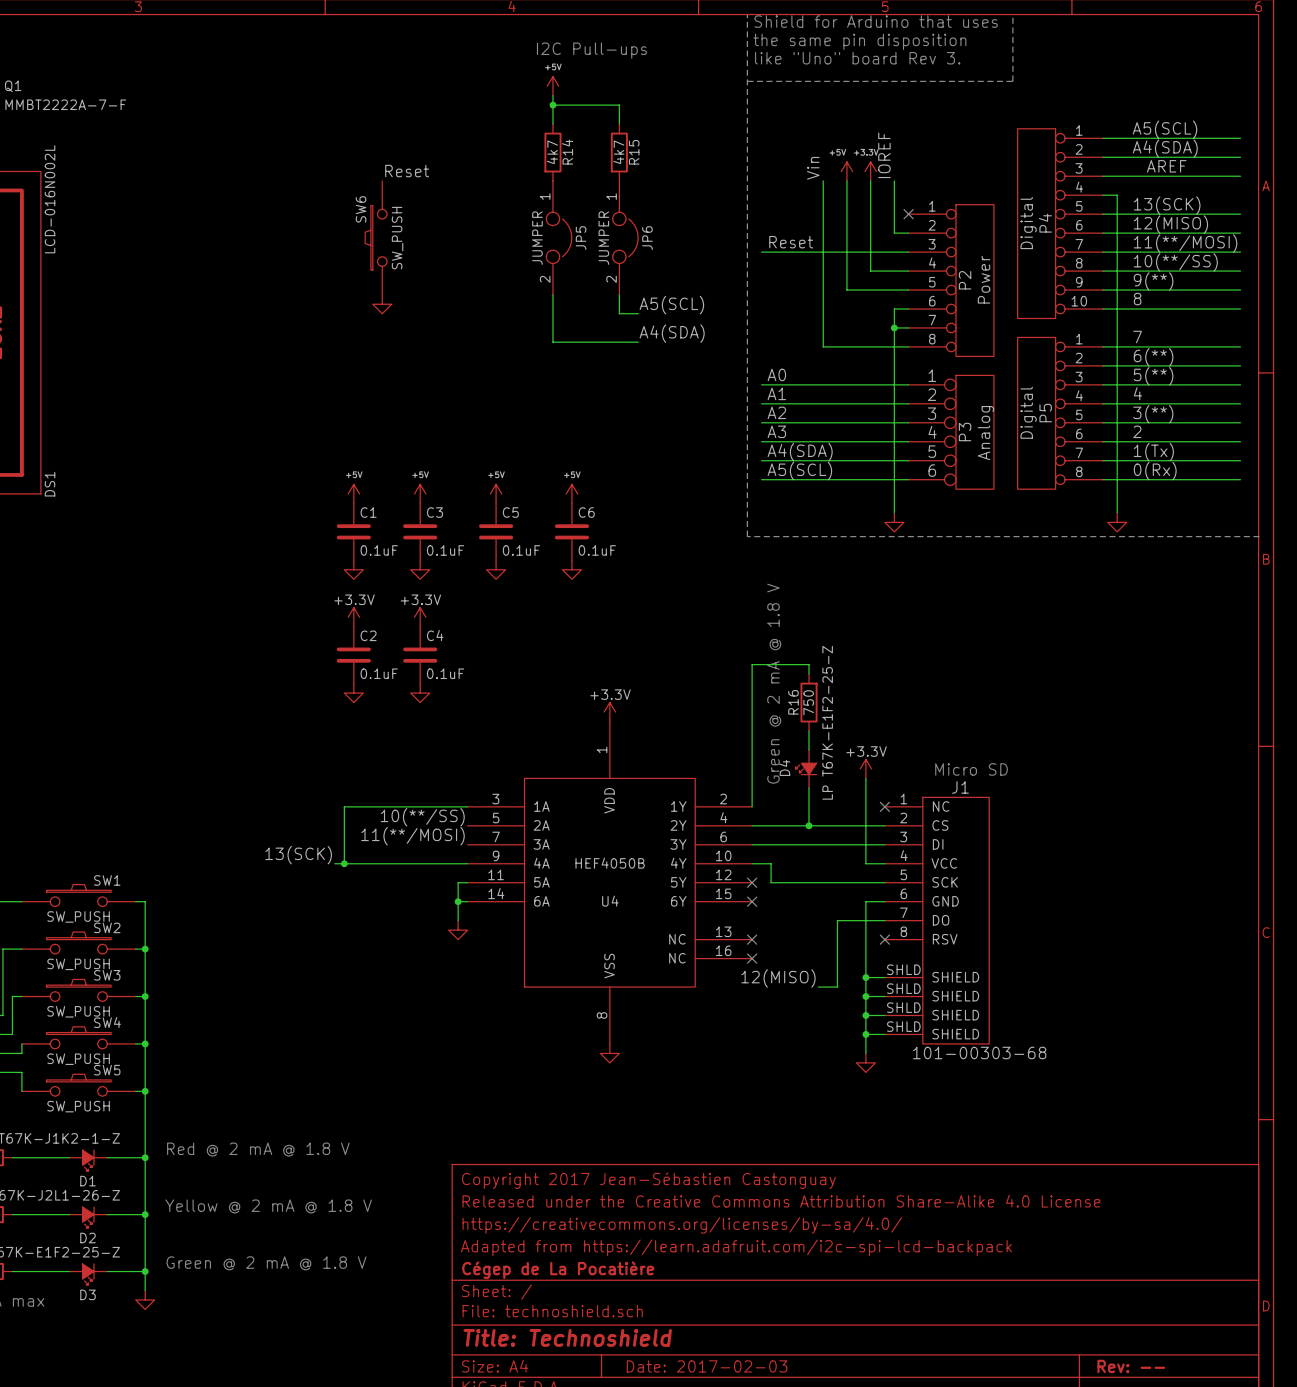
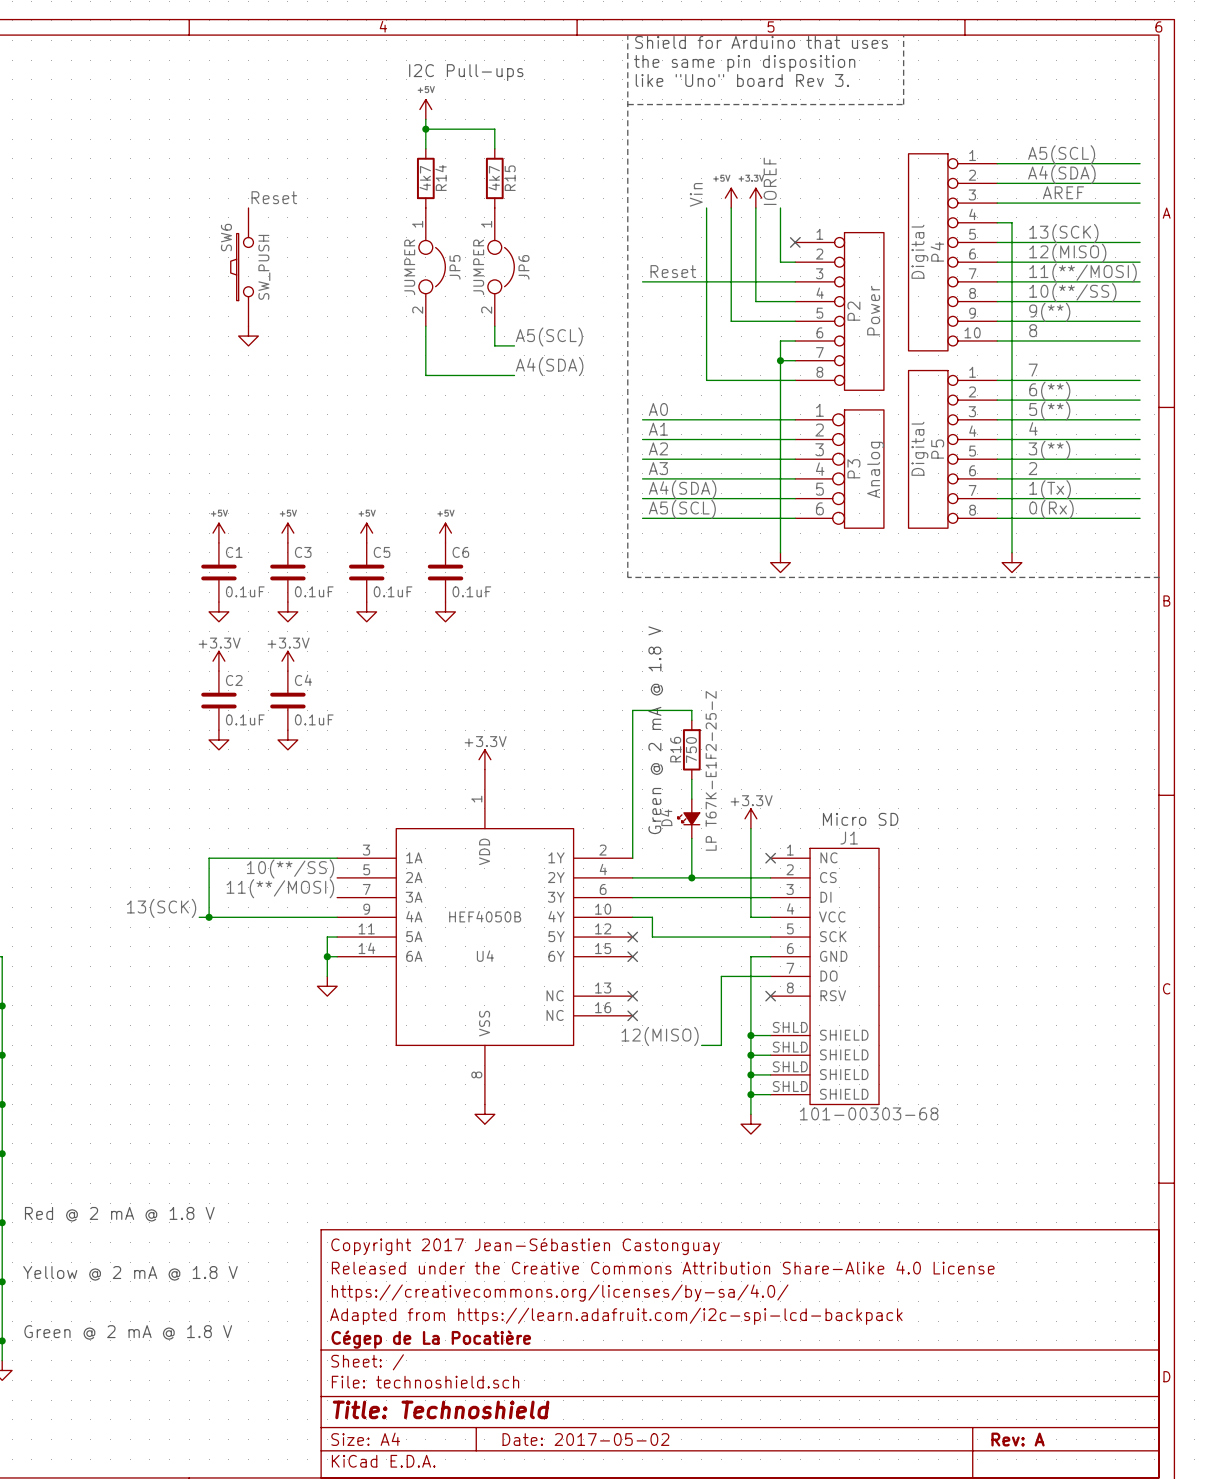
title block: Date: 2017-02-03 (707, 1366) -> Date: 2017-05-02 (585, 1439)
title block: Rev: -- (1131, 1366) -> Rev: A (1018, 1439)

